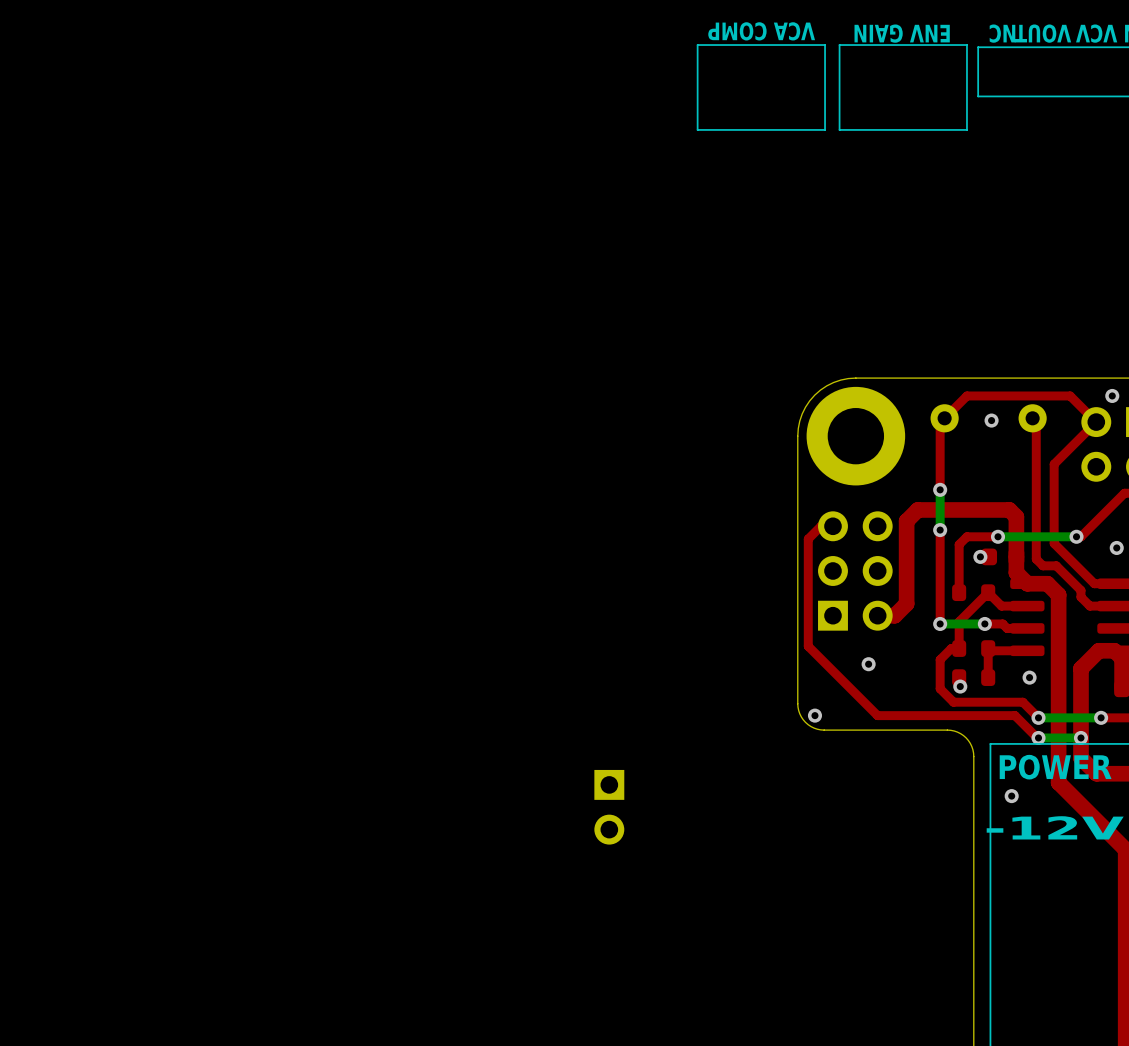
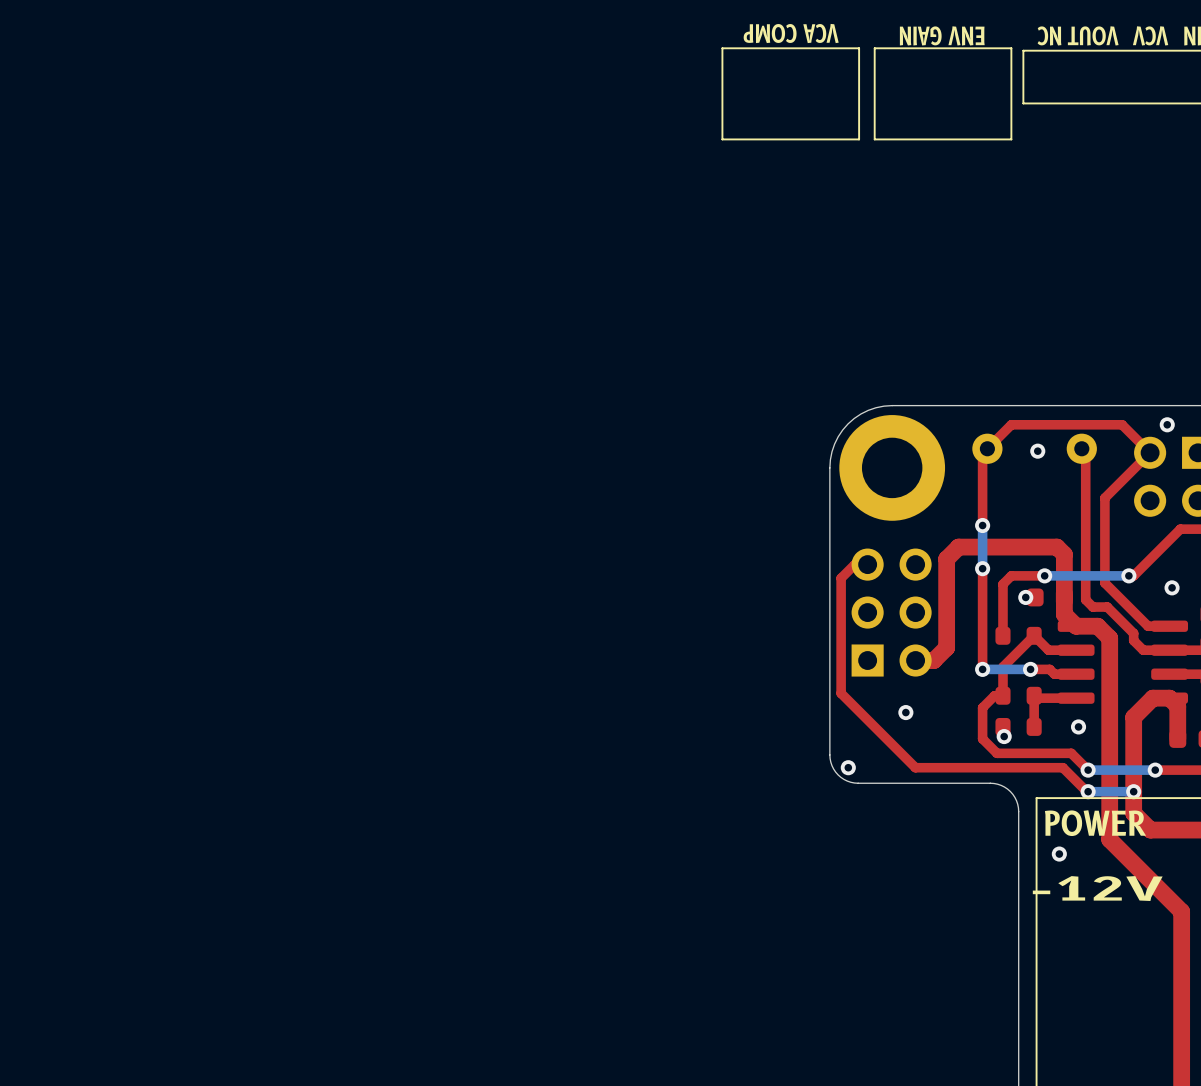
part: (609, 807) -> none

